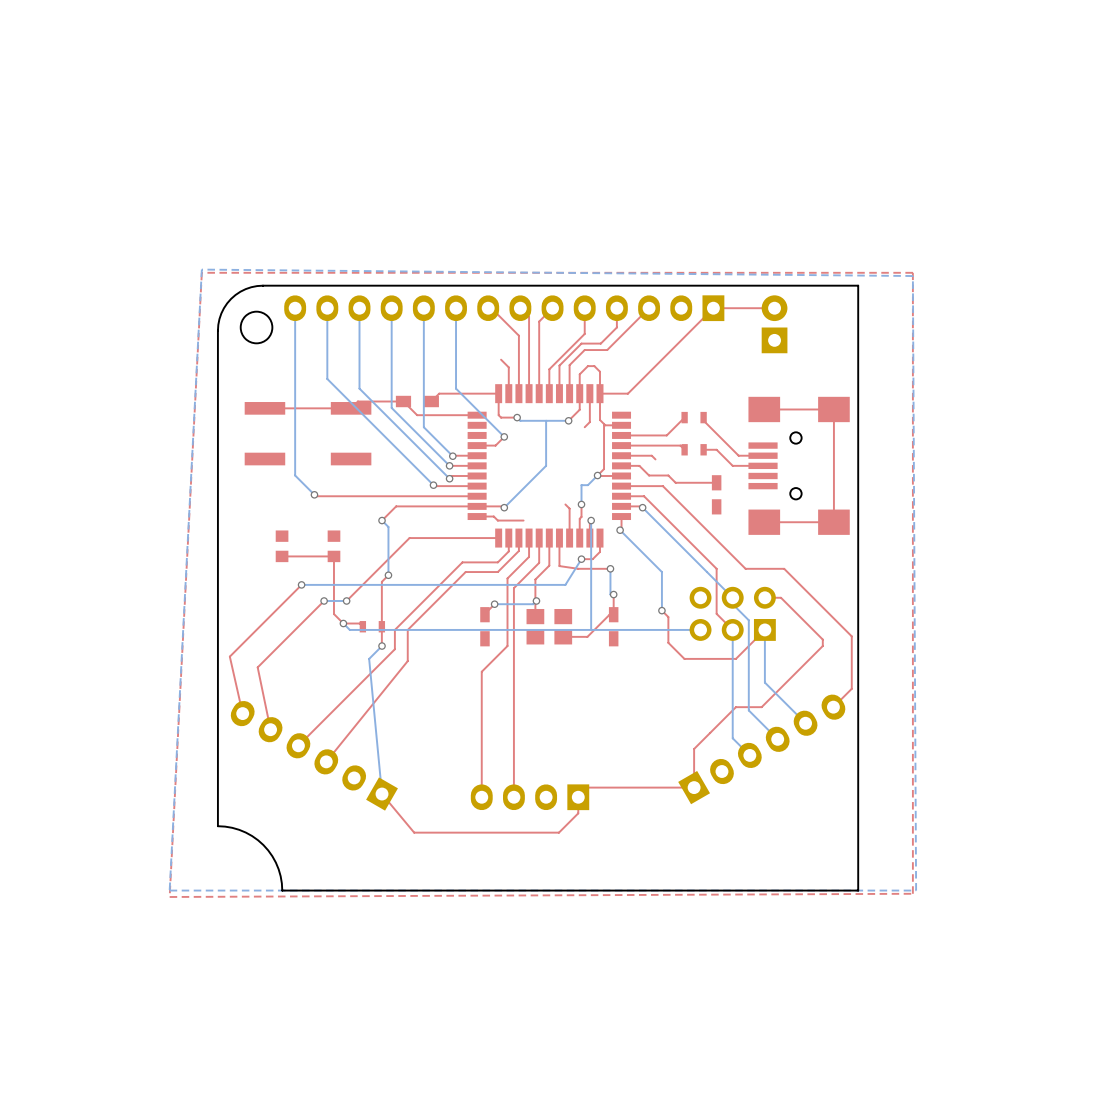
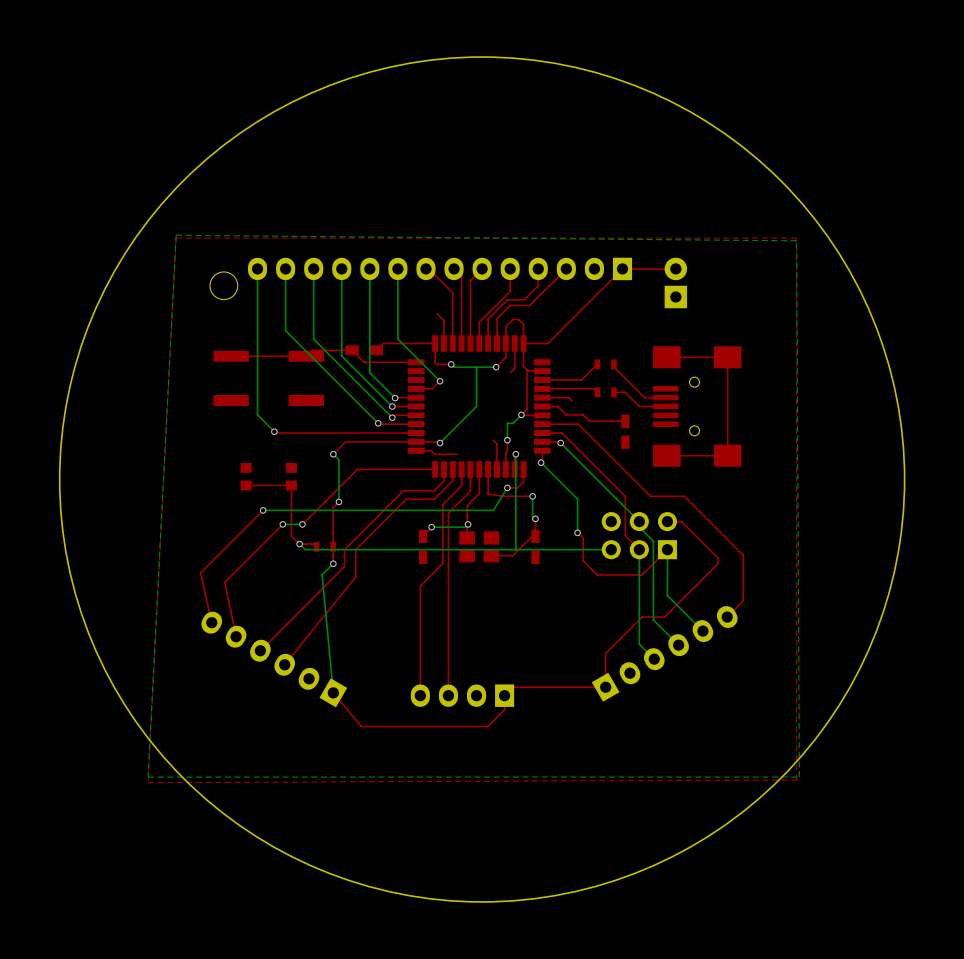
round board edge: none -> [58, 56, 906, 903]
board edge: (858, 285) (262, 285) (251, 287) (235, 294) (223, 308) (219, 319) (217, 330) (217, 826) (239, 829) (252, 836) (263, 845) (275, 862) (280, 876) (282, 890) (858, 890) (858, 285) -> none

